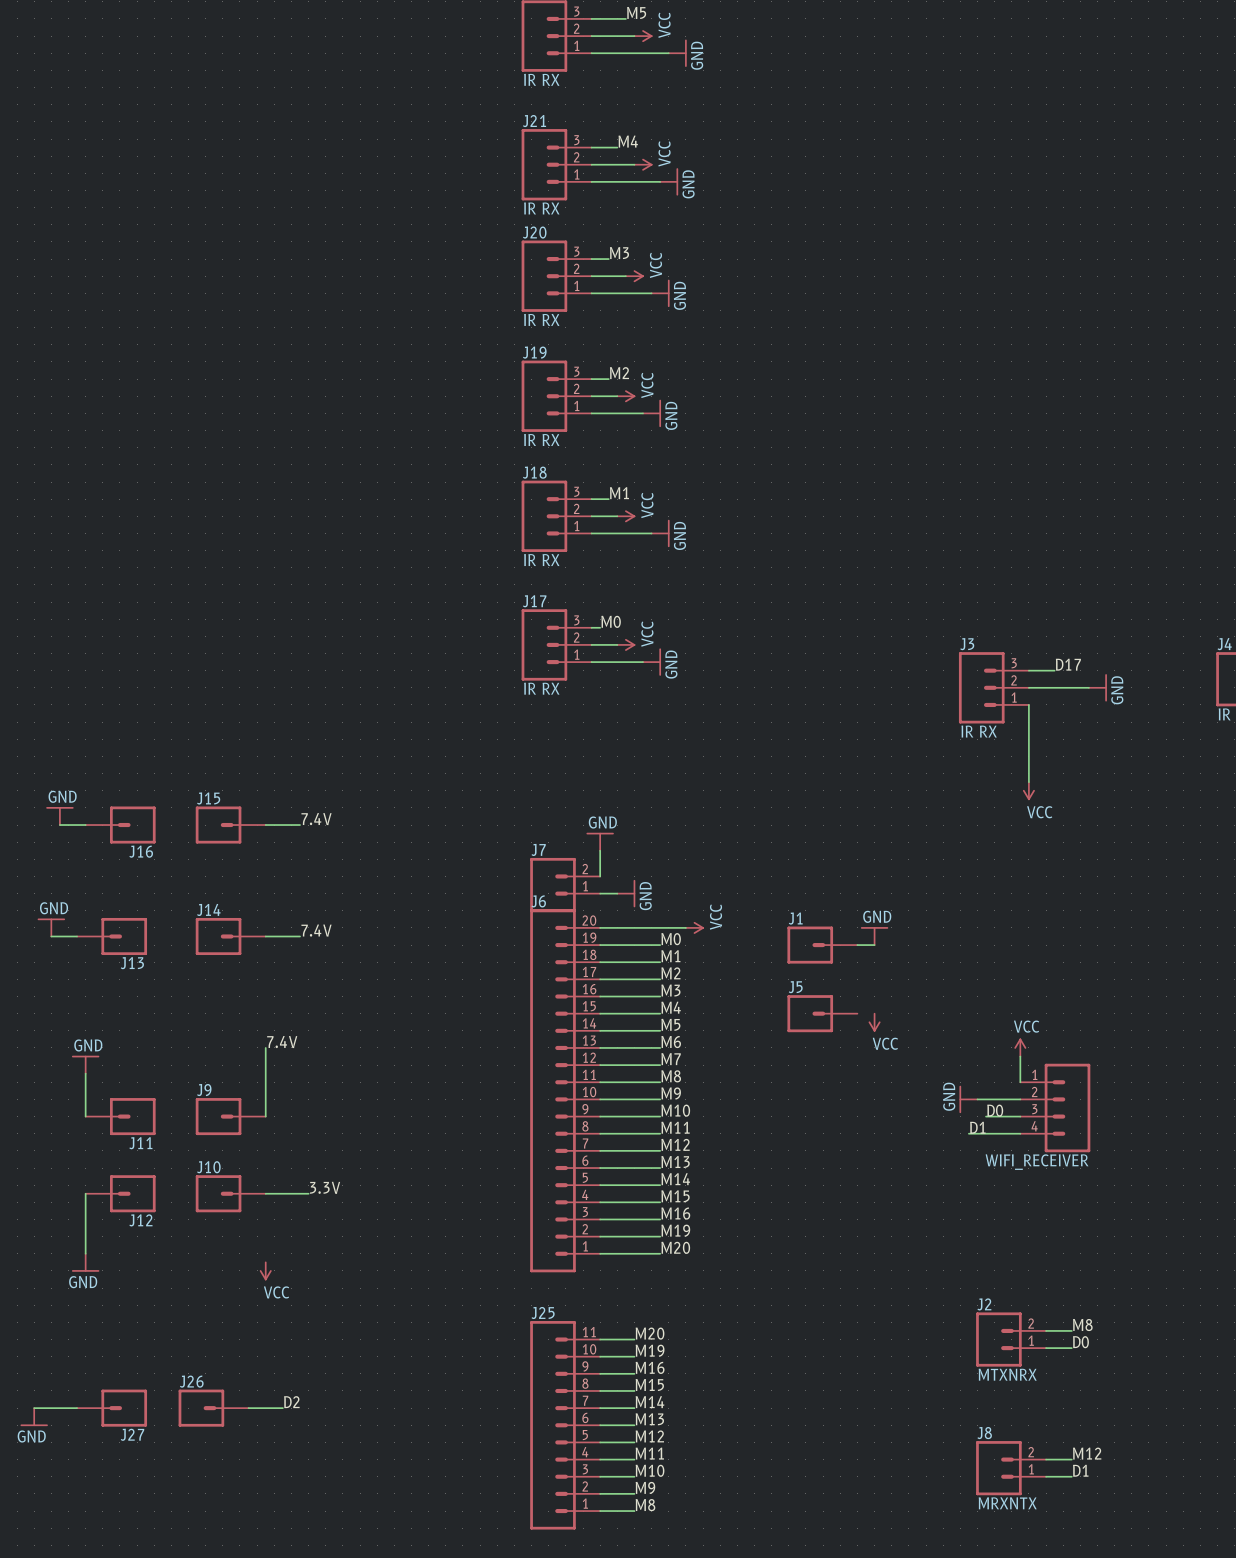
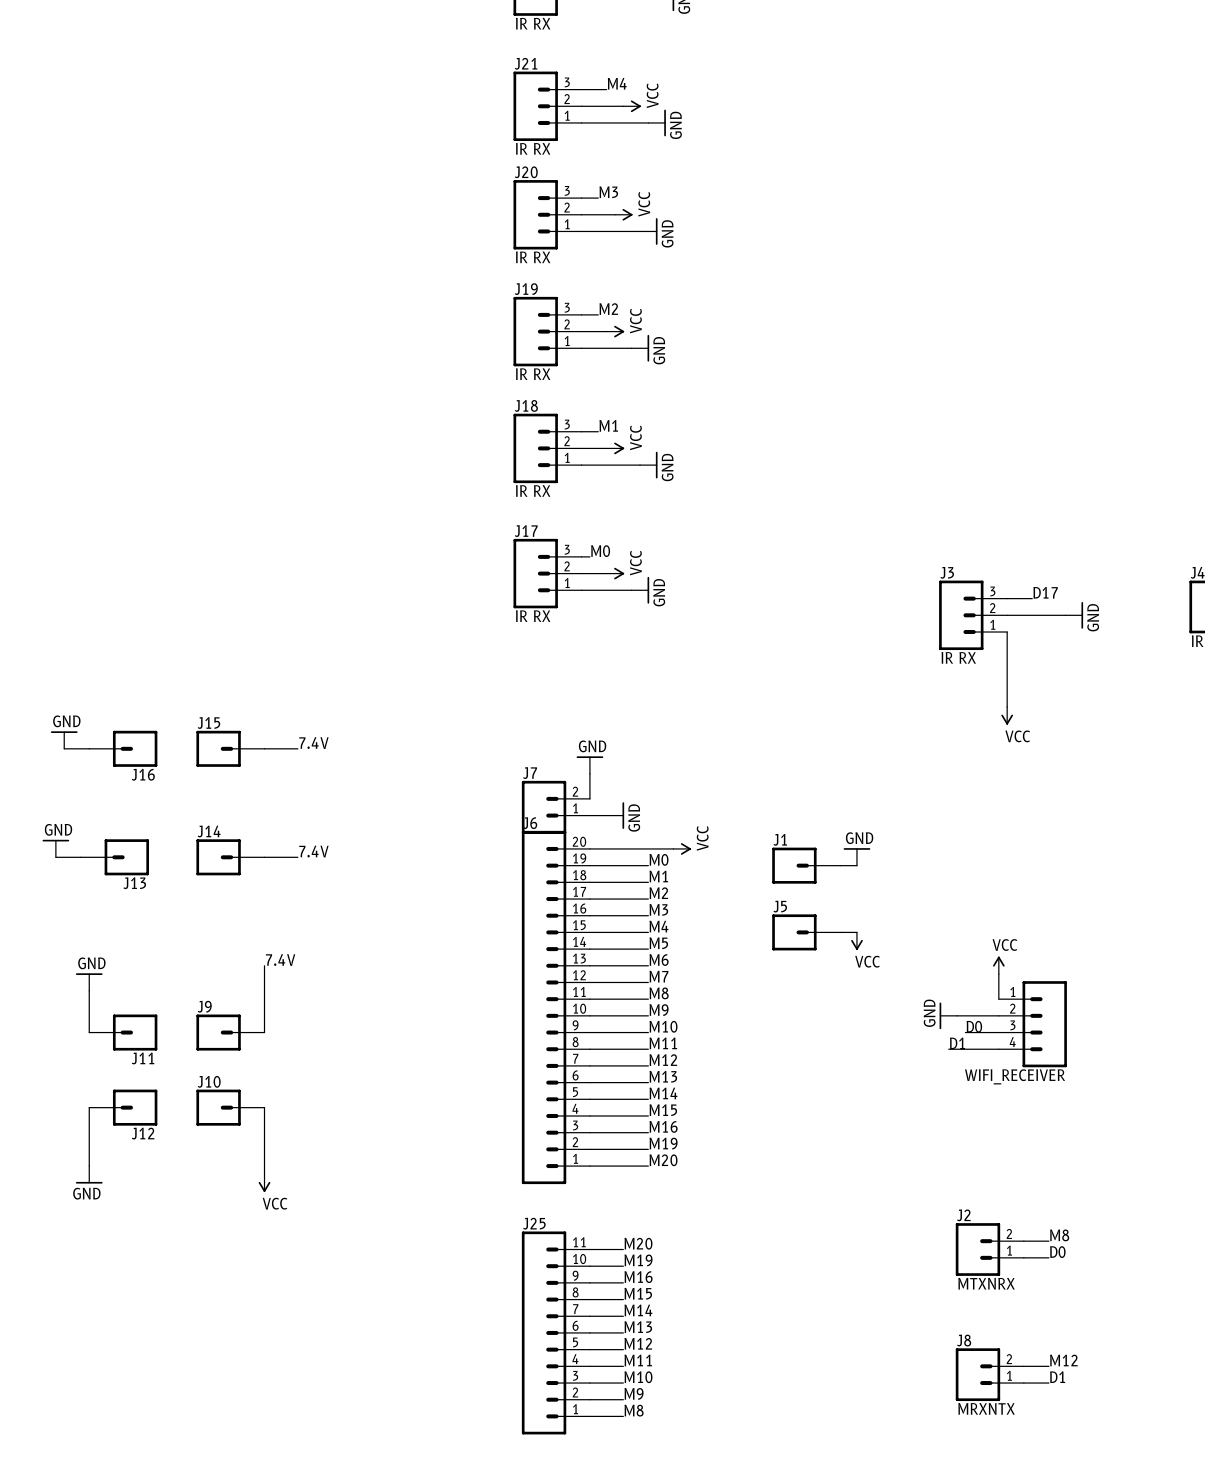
wire: none -> (840, 932) (856, 932)
label: 3.3V (325, 1187) -> none
wire: (265, 1193) (308, 1193) -> (264, 1107) (264, 1174)
label: D2 (291, 1402) -> none
wire: (34, 1408) (77, 1408) -> none
J27: (112, 1408) -> none
J26: (213, 1408) -> none
wire: (248, 1408) (282, 1408) -> none
power symbol: GND (34, 1417) -> none

